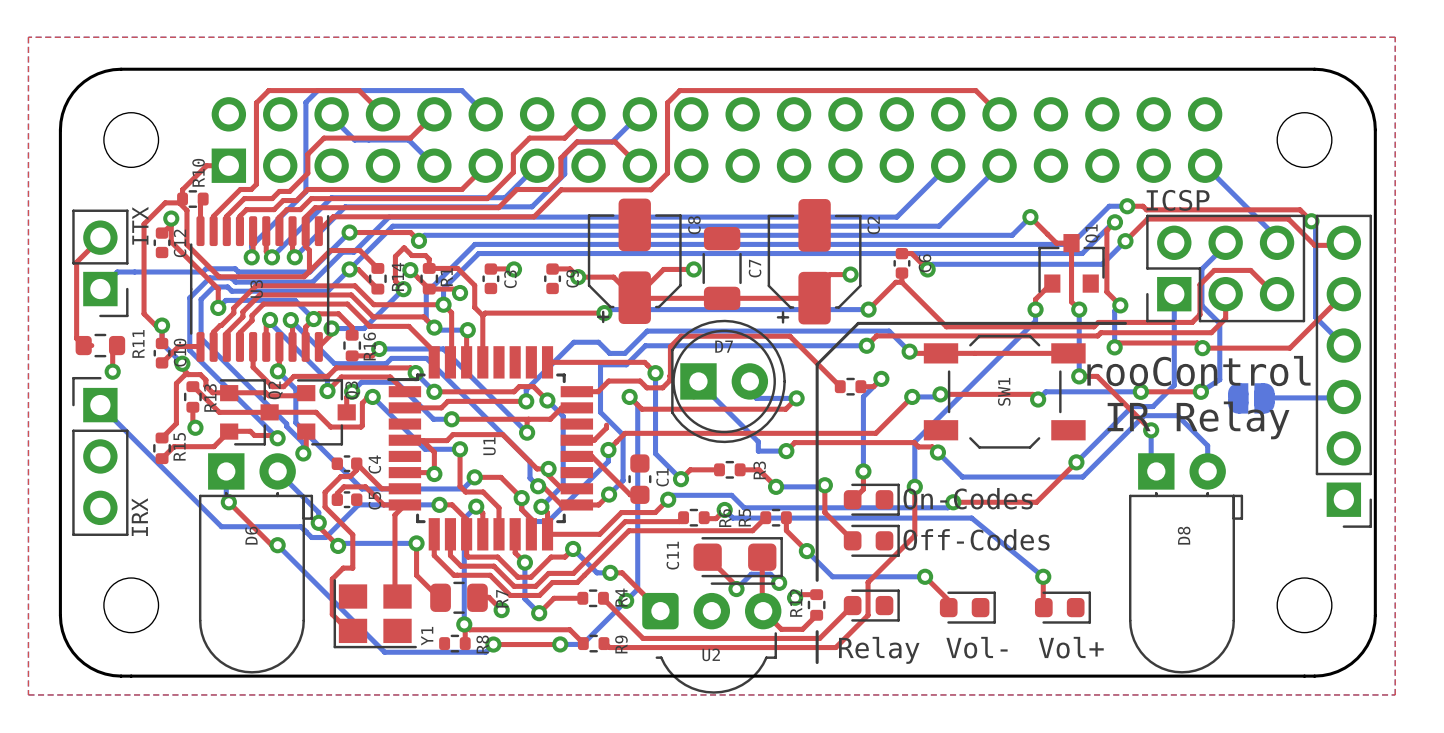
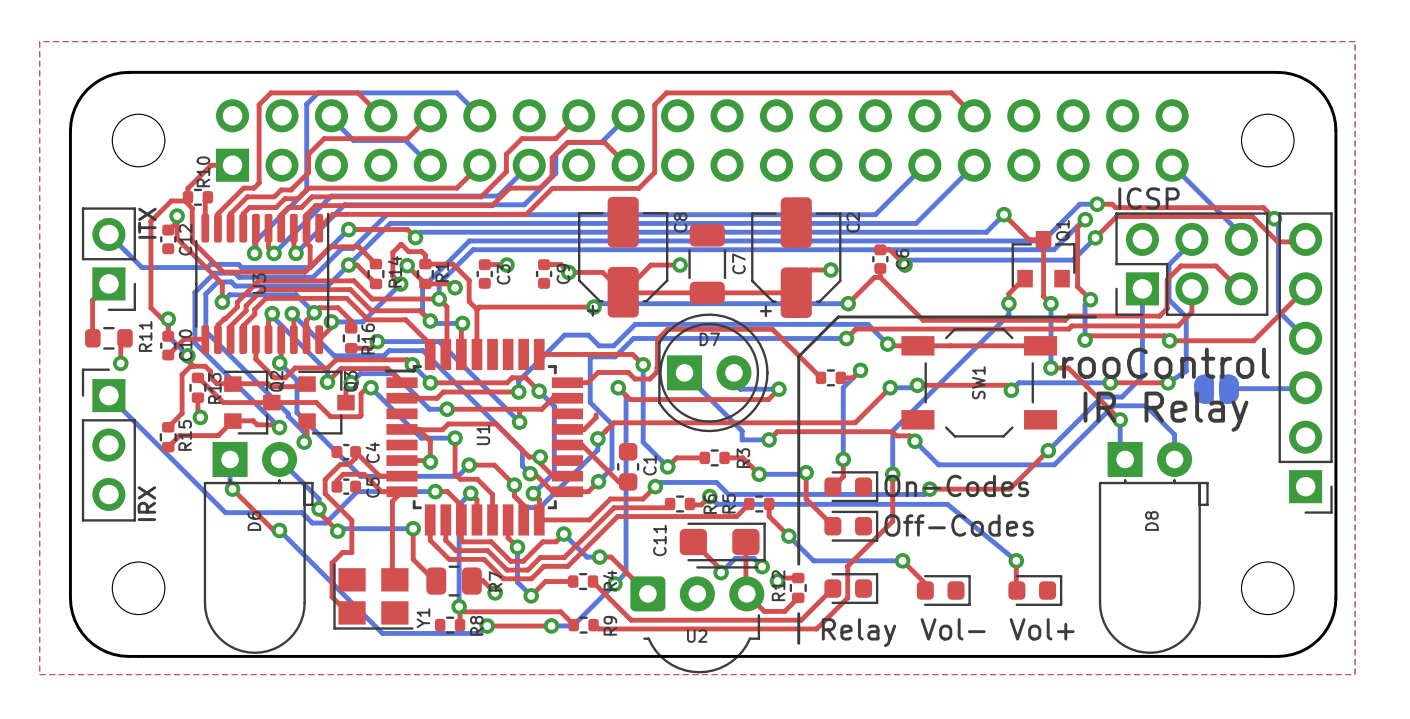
top track: (100, 238) (76, 262) (76, 338) (83, 345) (91, 345) -> none
bottom track: (134, 272) (117, 272) (99, 289) -> (141, 267) (108, 234)
top track: none -> (108, 283) (92, 300) (92, 339)

